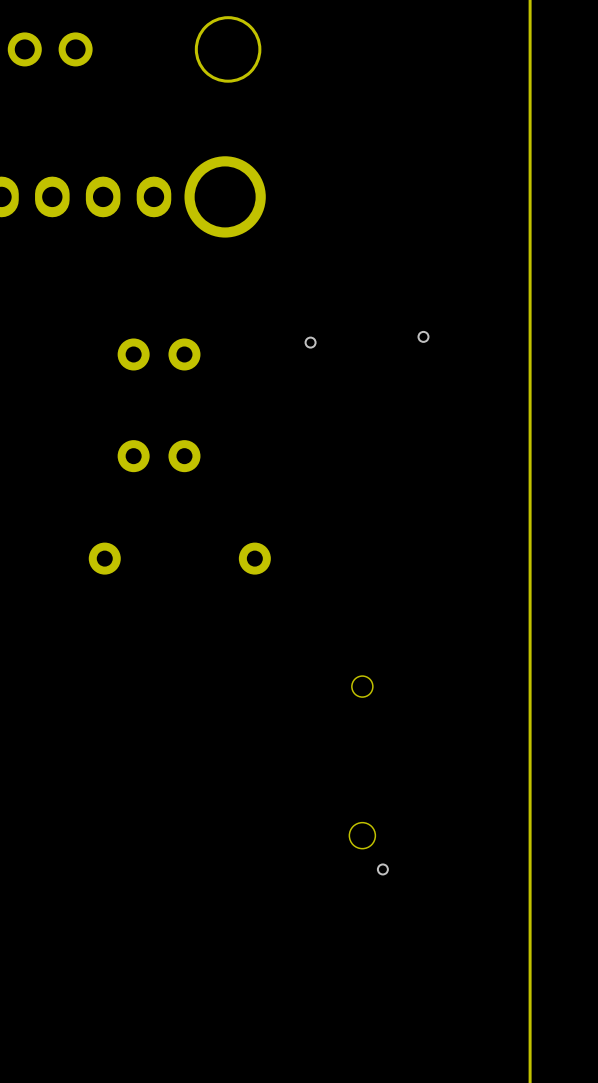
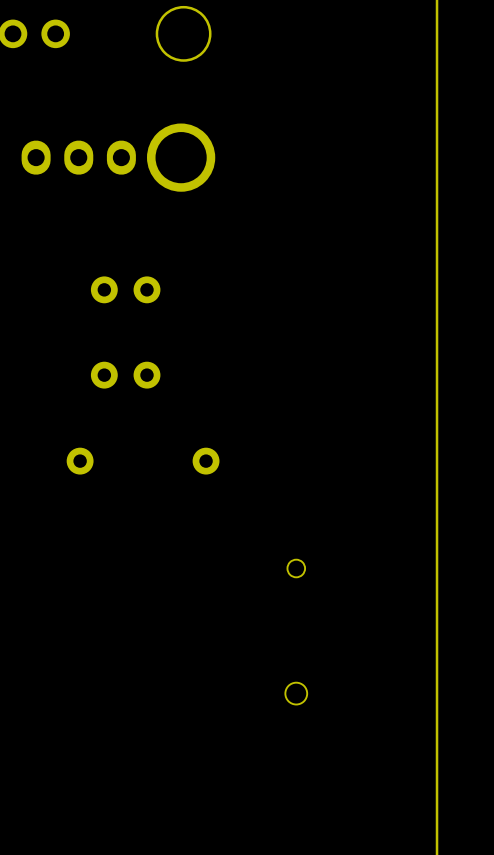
via: (423, 336) -> none
via: (310, 342) -> none
via: (382, 869) -> none

